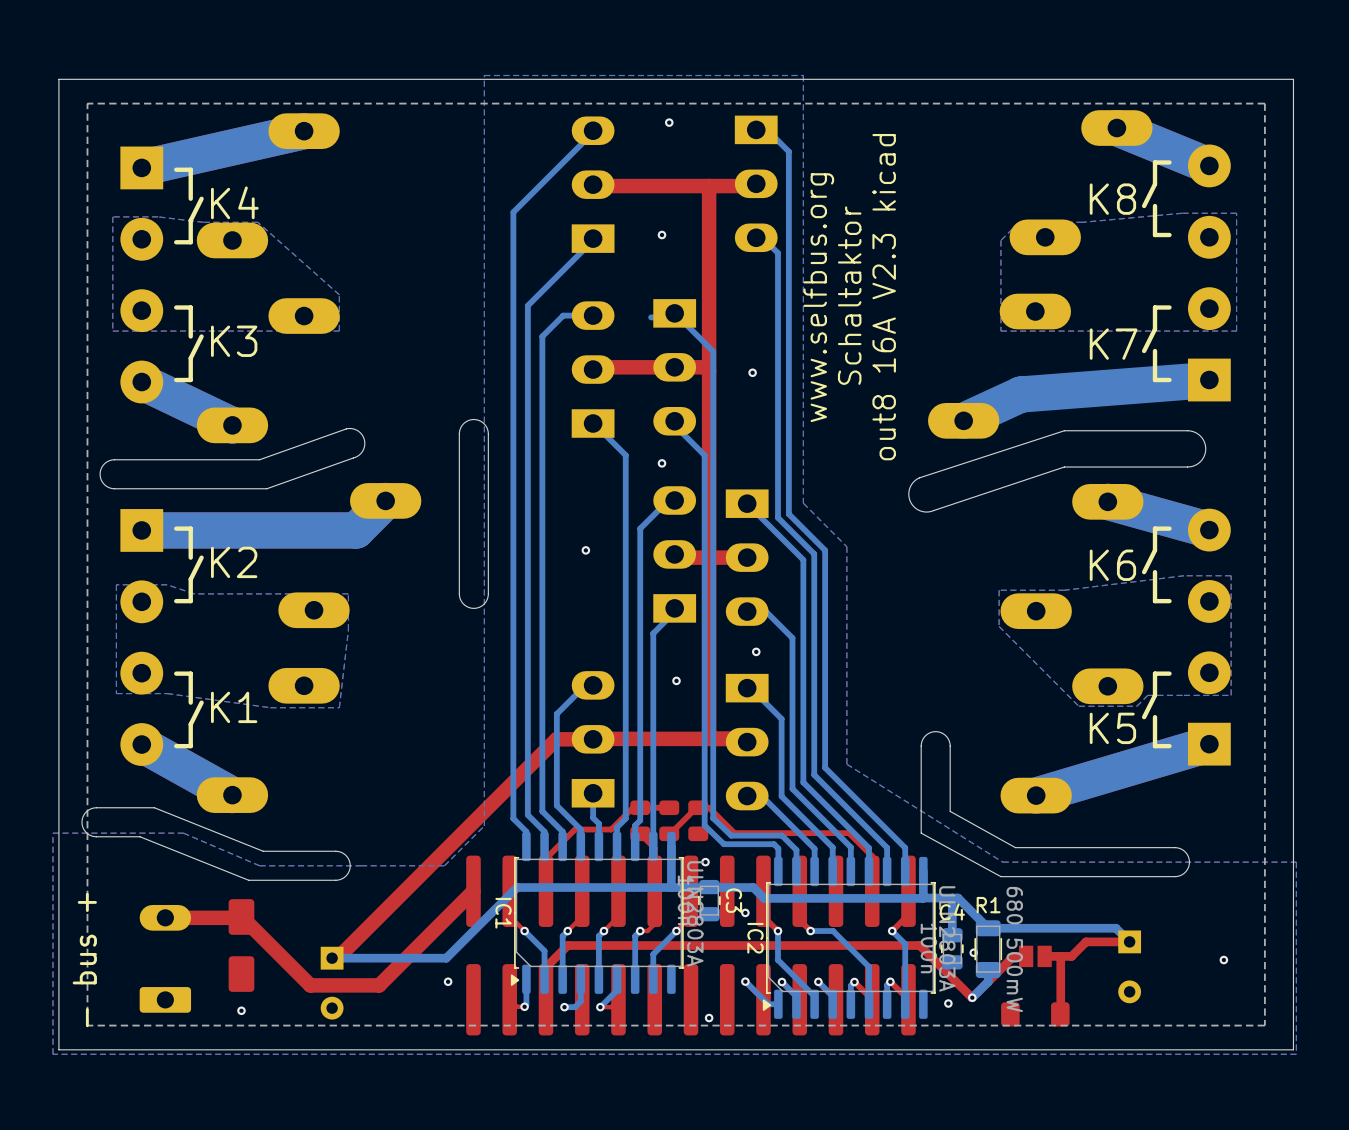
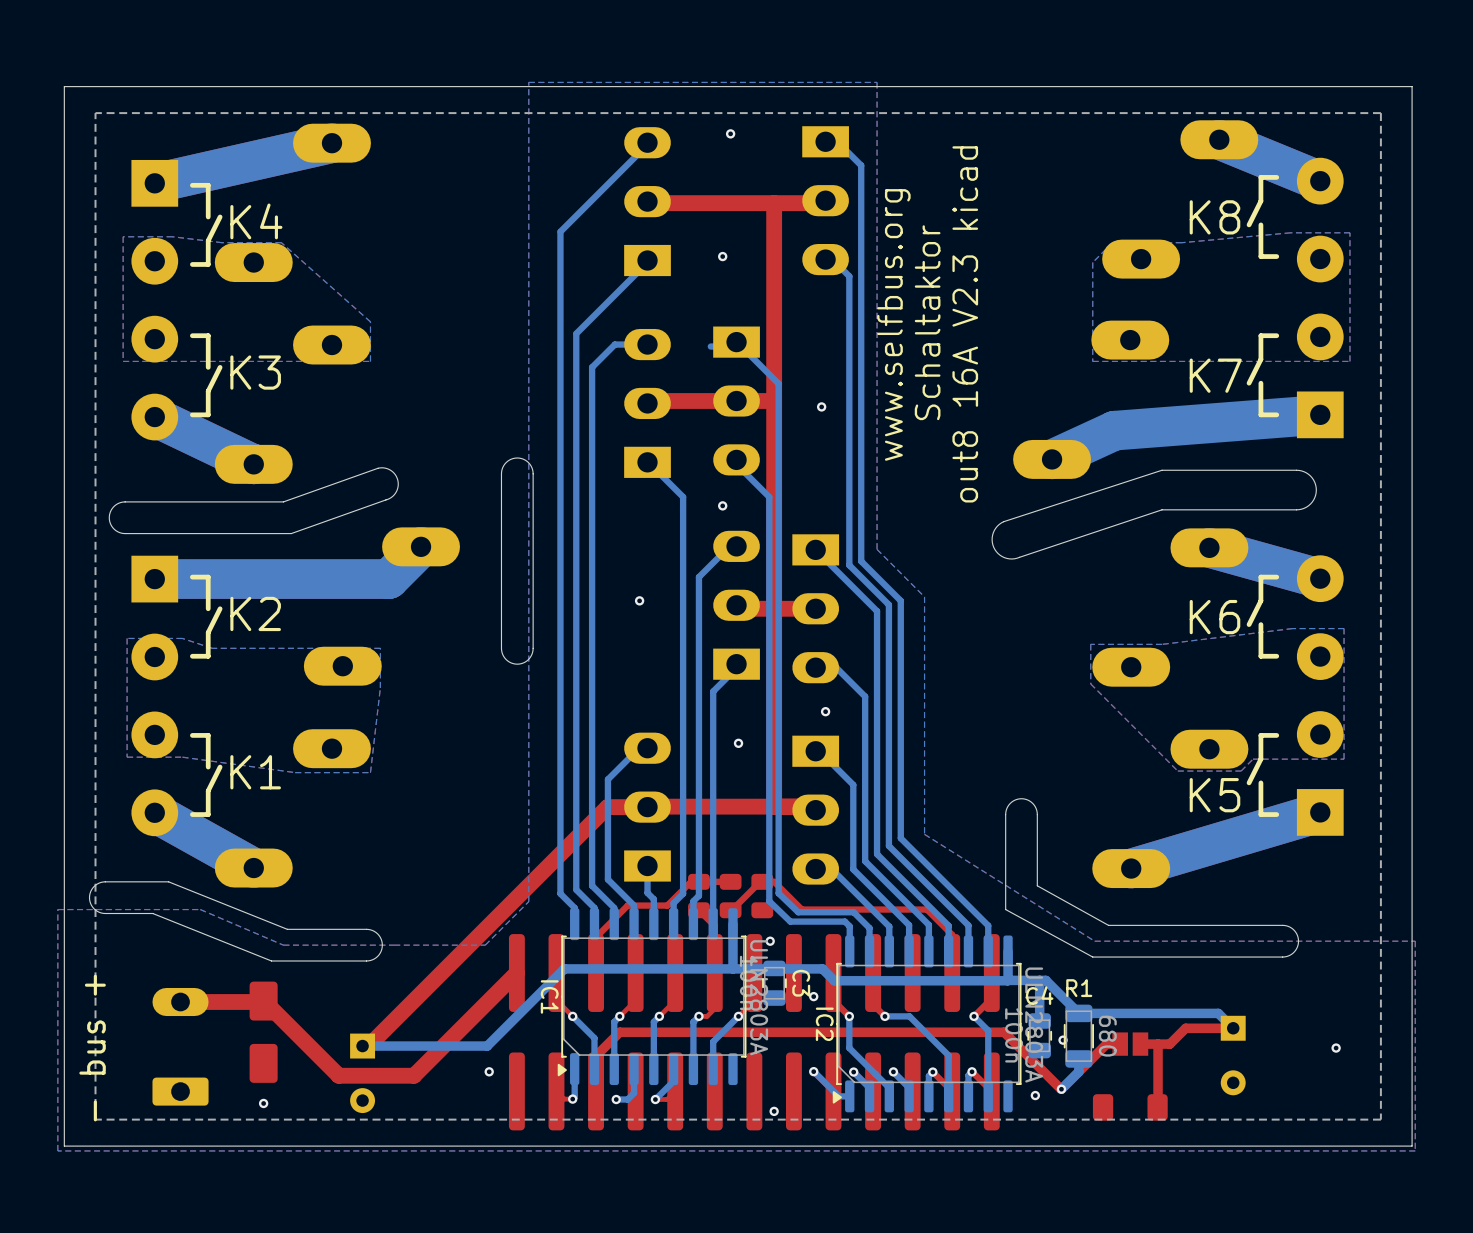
R1 value: 680 500mW (1014, 949) -> 680 (1107, 1036)

